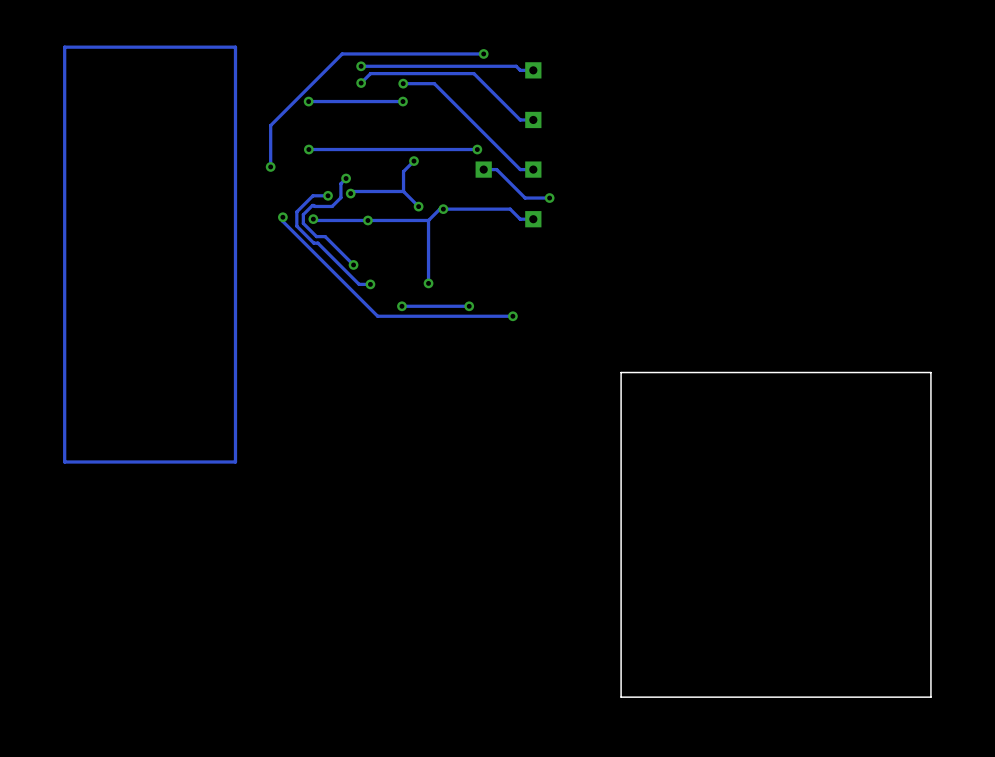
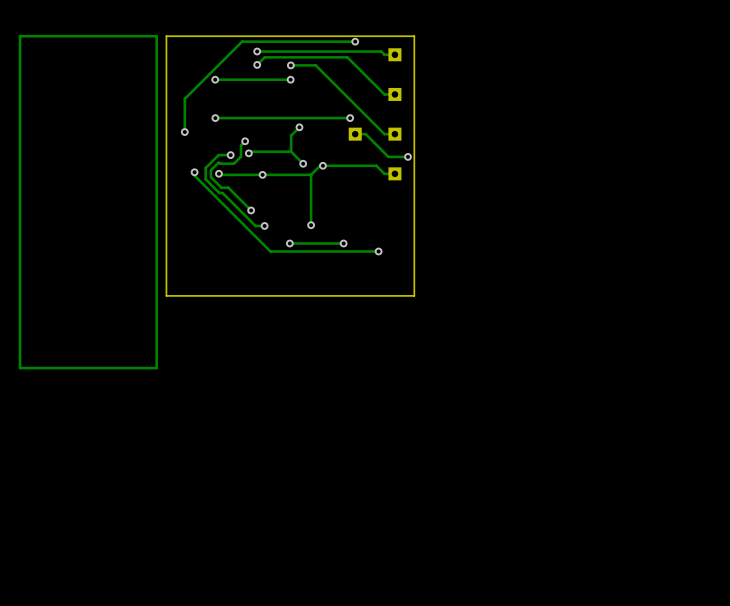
board edge: none -> (414, 36) (166, 36) (166, 295) (414, 295) (414, 36)
board edge: (930, 372) (621, 372) (621, 697) (930, 697) (930, 372) -> none

